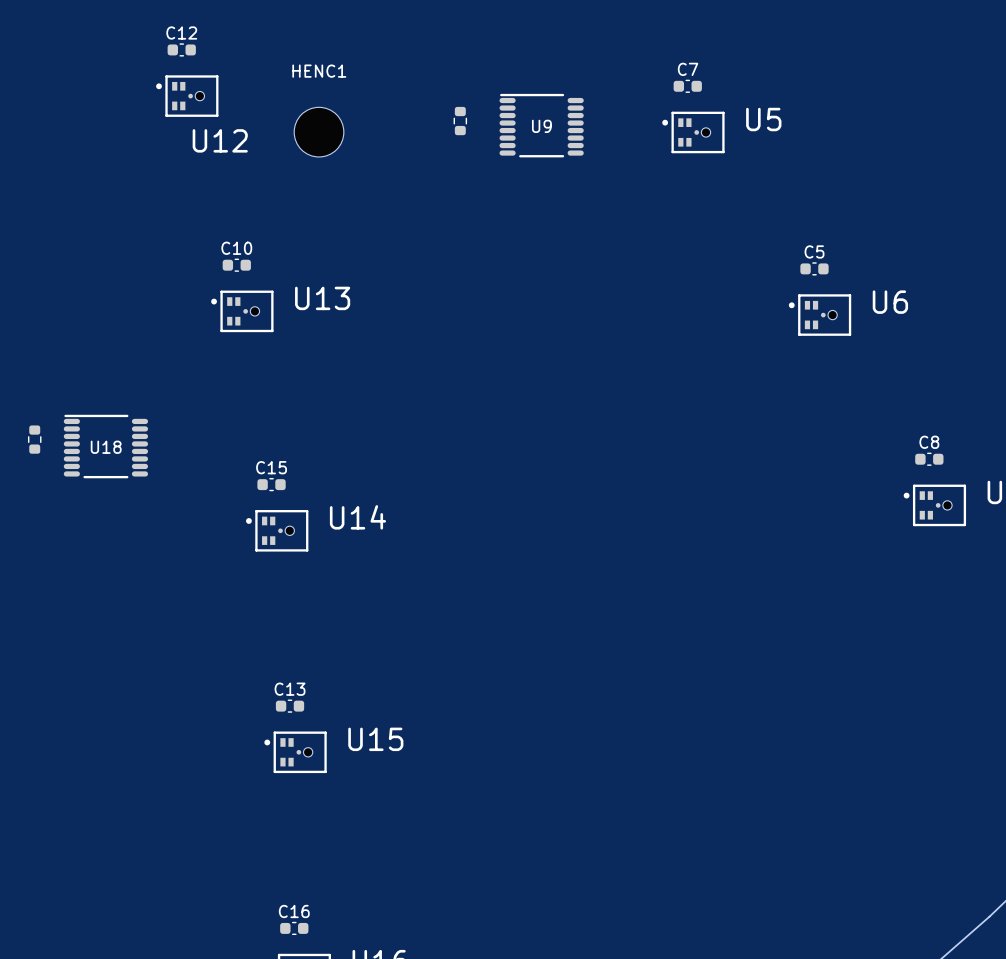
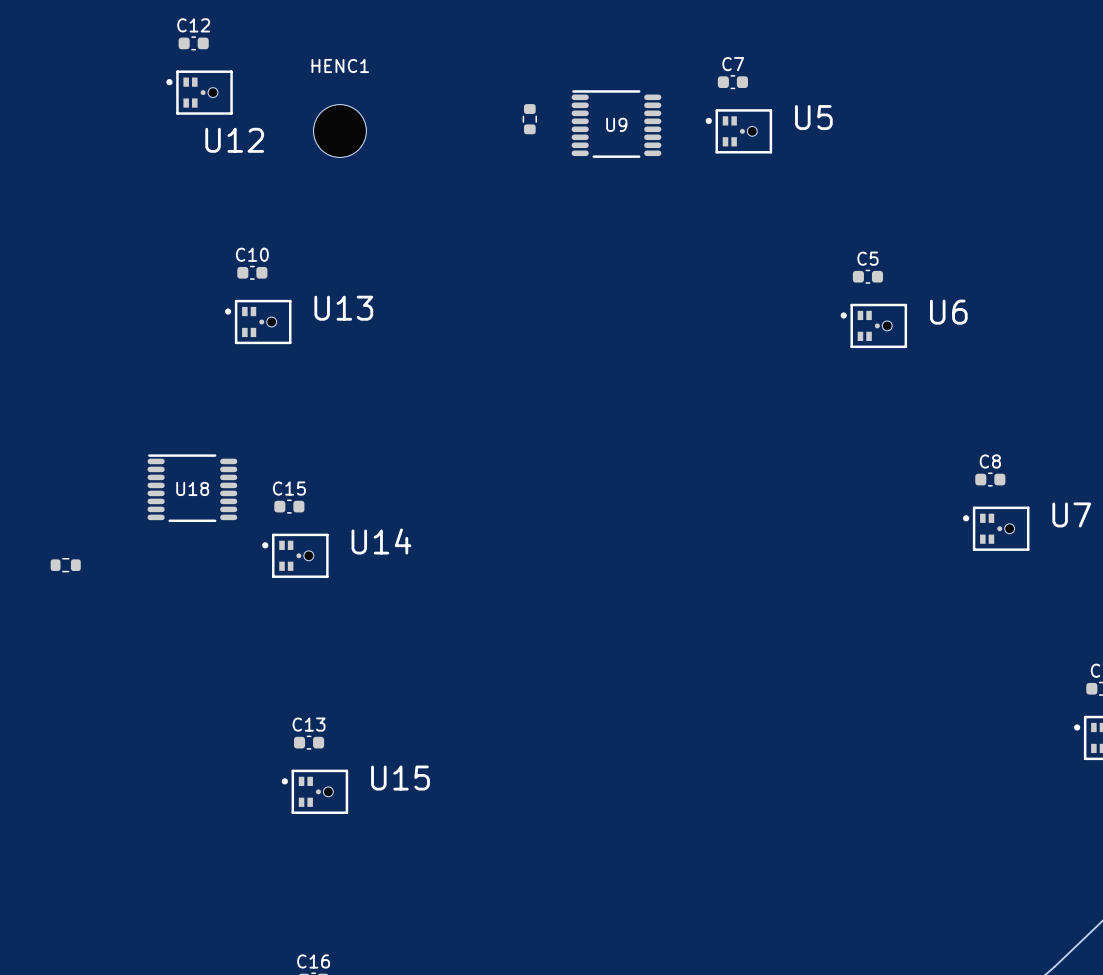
part position: (460, 121) -> (529, 119)
U9 position: (541, 125) -> (616, 124)
part rotation: 0° (34, 439) -> 90° clockwise (65, 565)
part position: (34, 439) -> (65, 565)
U18 position: (105, 446) -> (192, 488)

